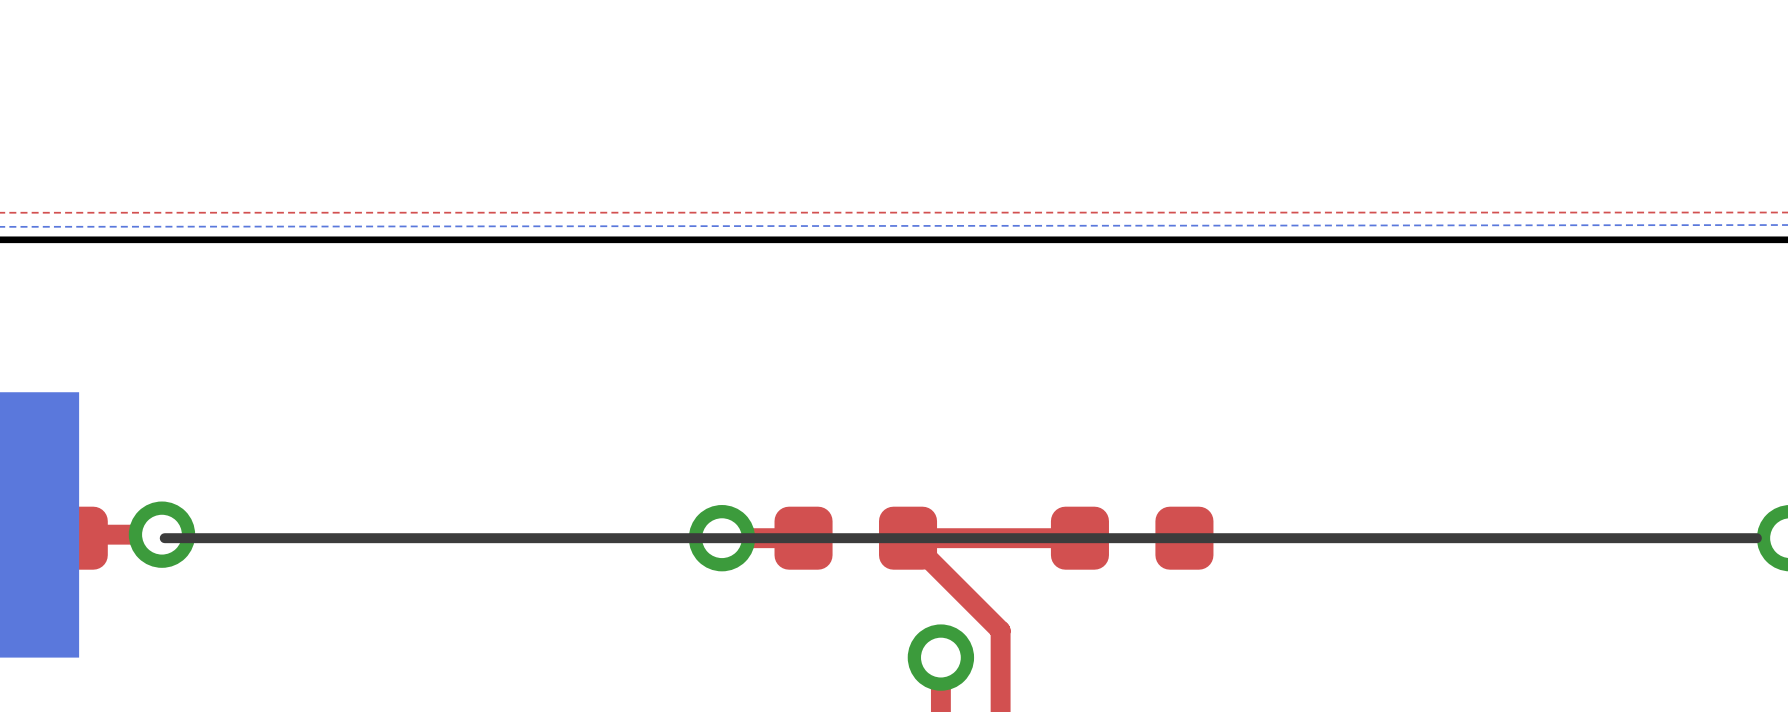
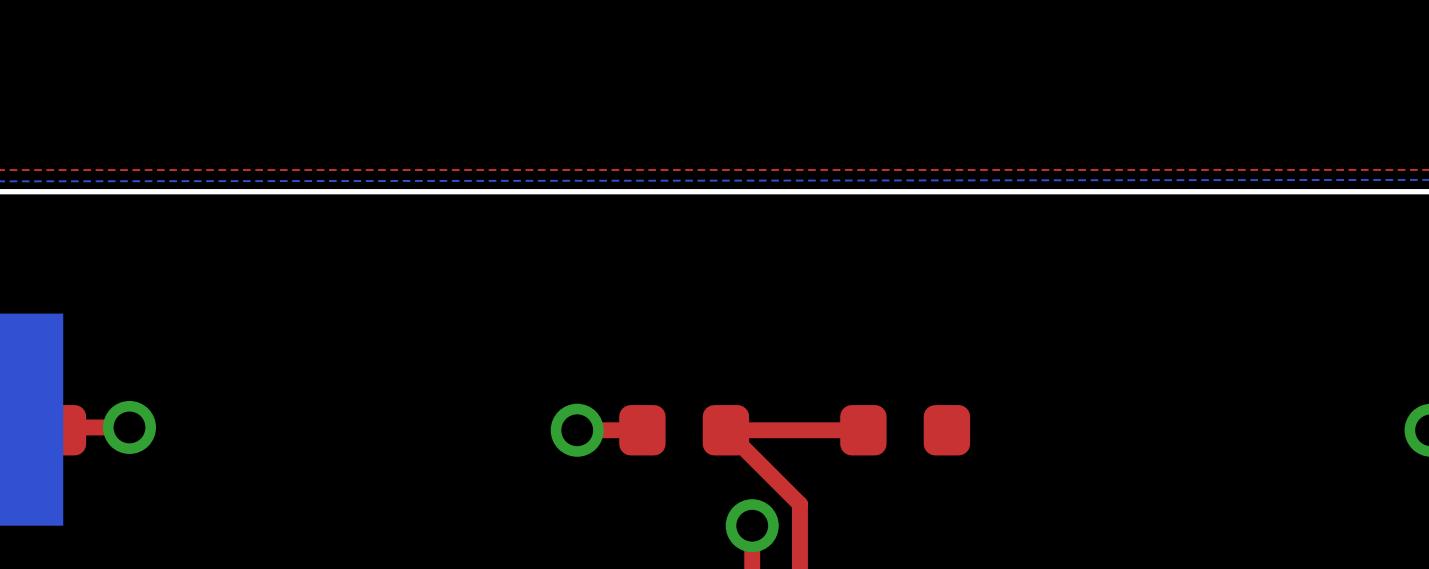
line: (1756, 538) (164, 538) -> none

